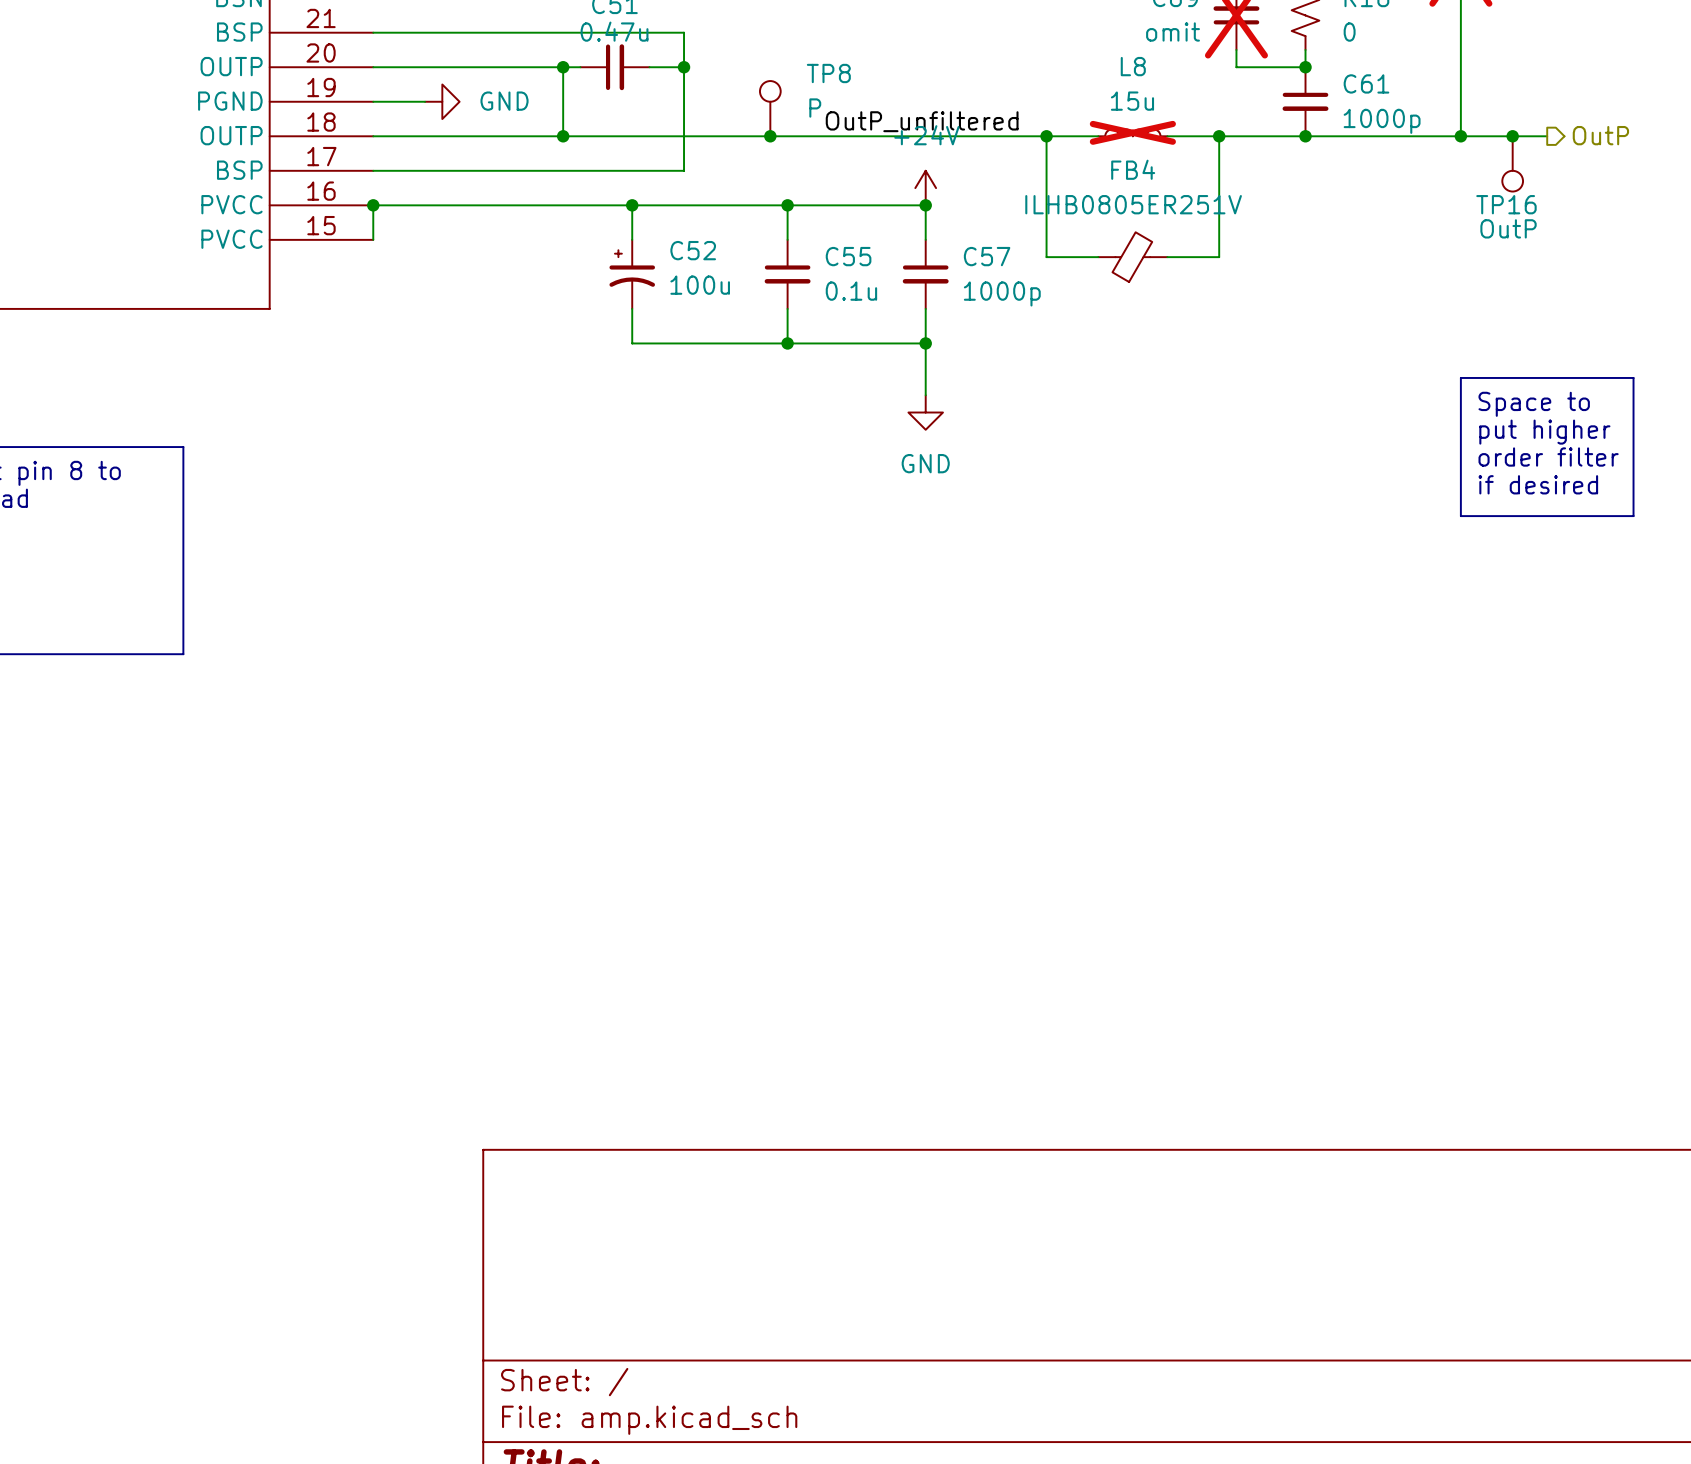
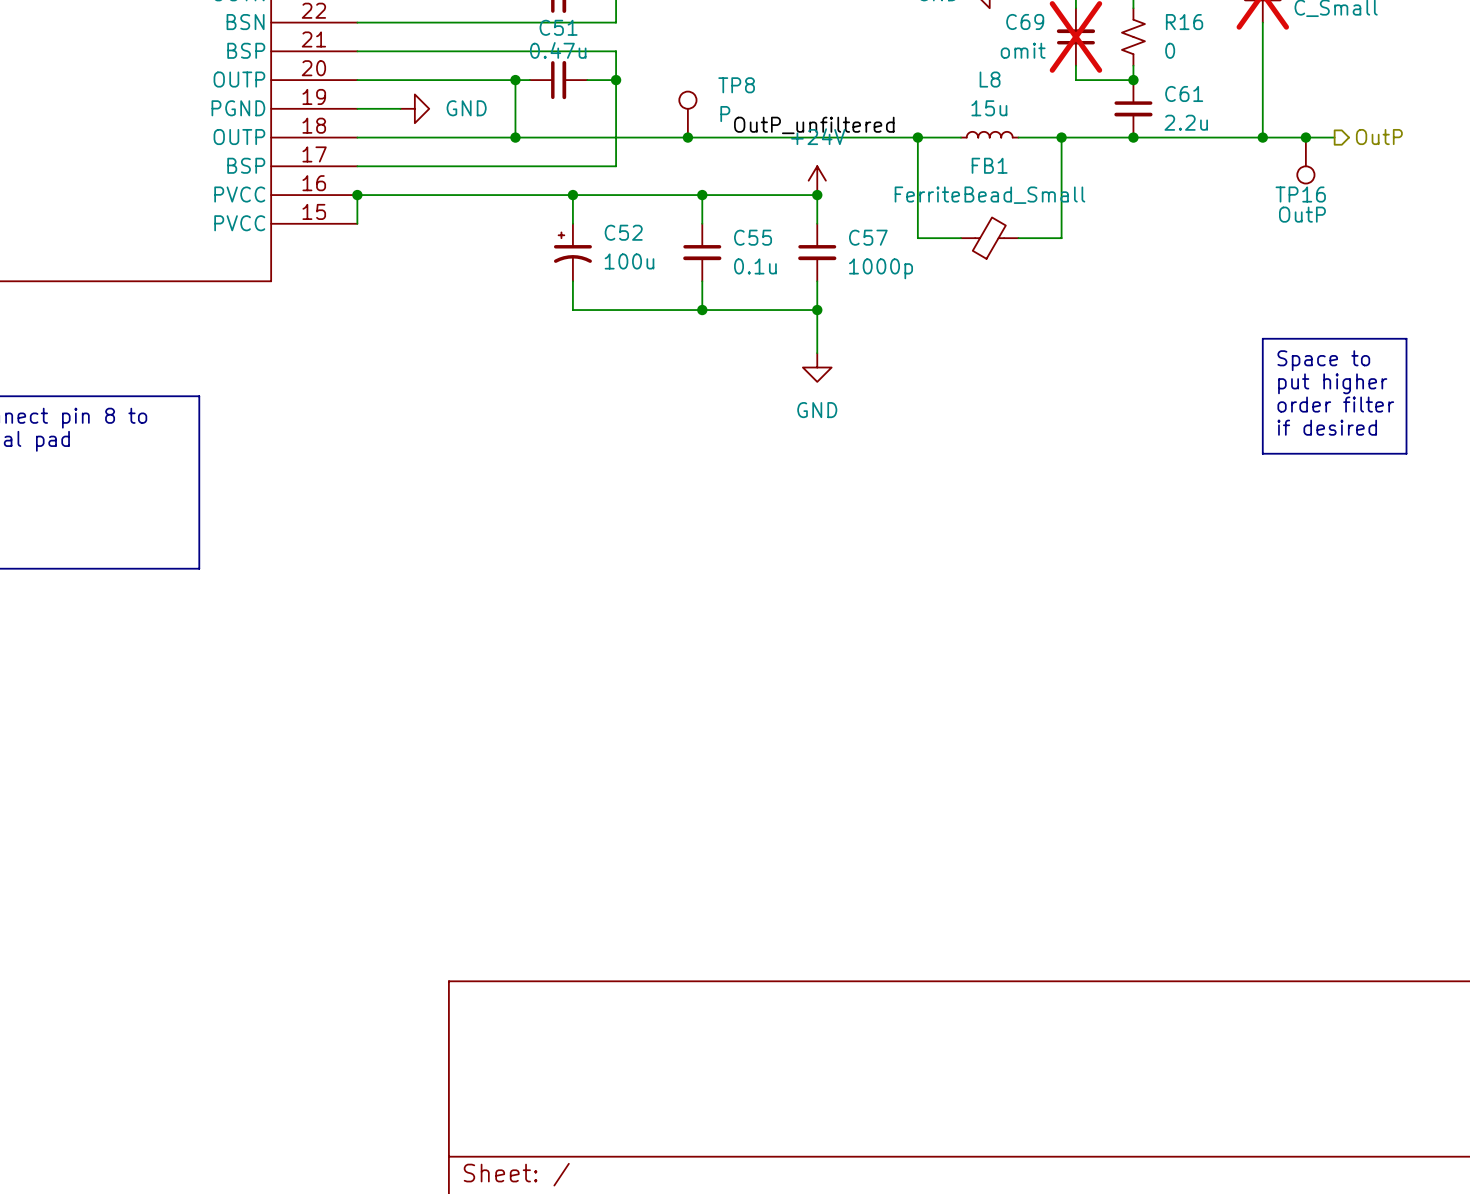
C61 value: 1000p (1382, 121) -> 2.2u (1186, 122)
L8 do-not-place cross: (1132, 132) -> none
FB4 name: FB4 (1133, 169) -> FB1 (989, 165)
FB4 value: ILHB0805ER251V (1133, 204) -> FerriteBead_Small (989, 195)

